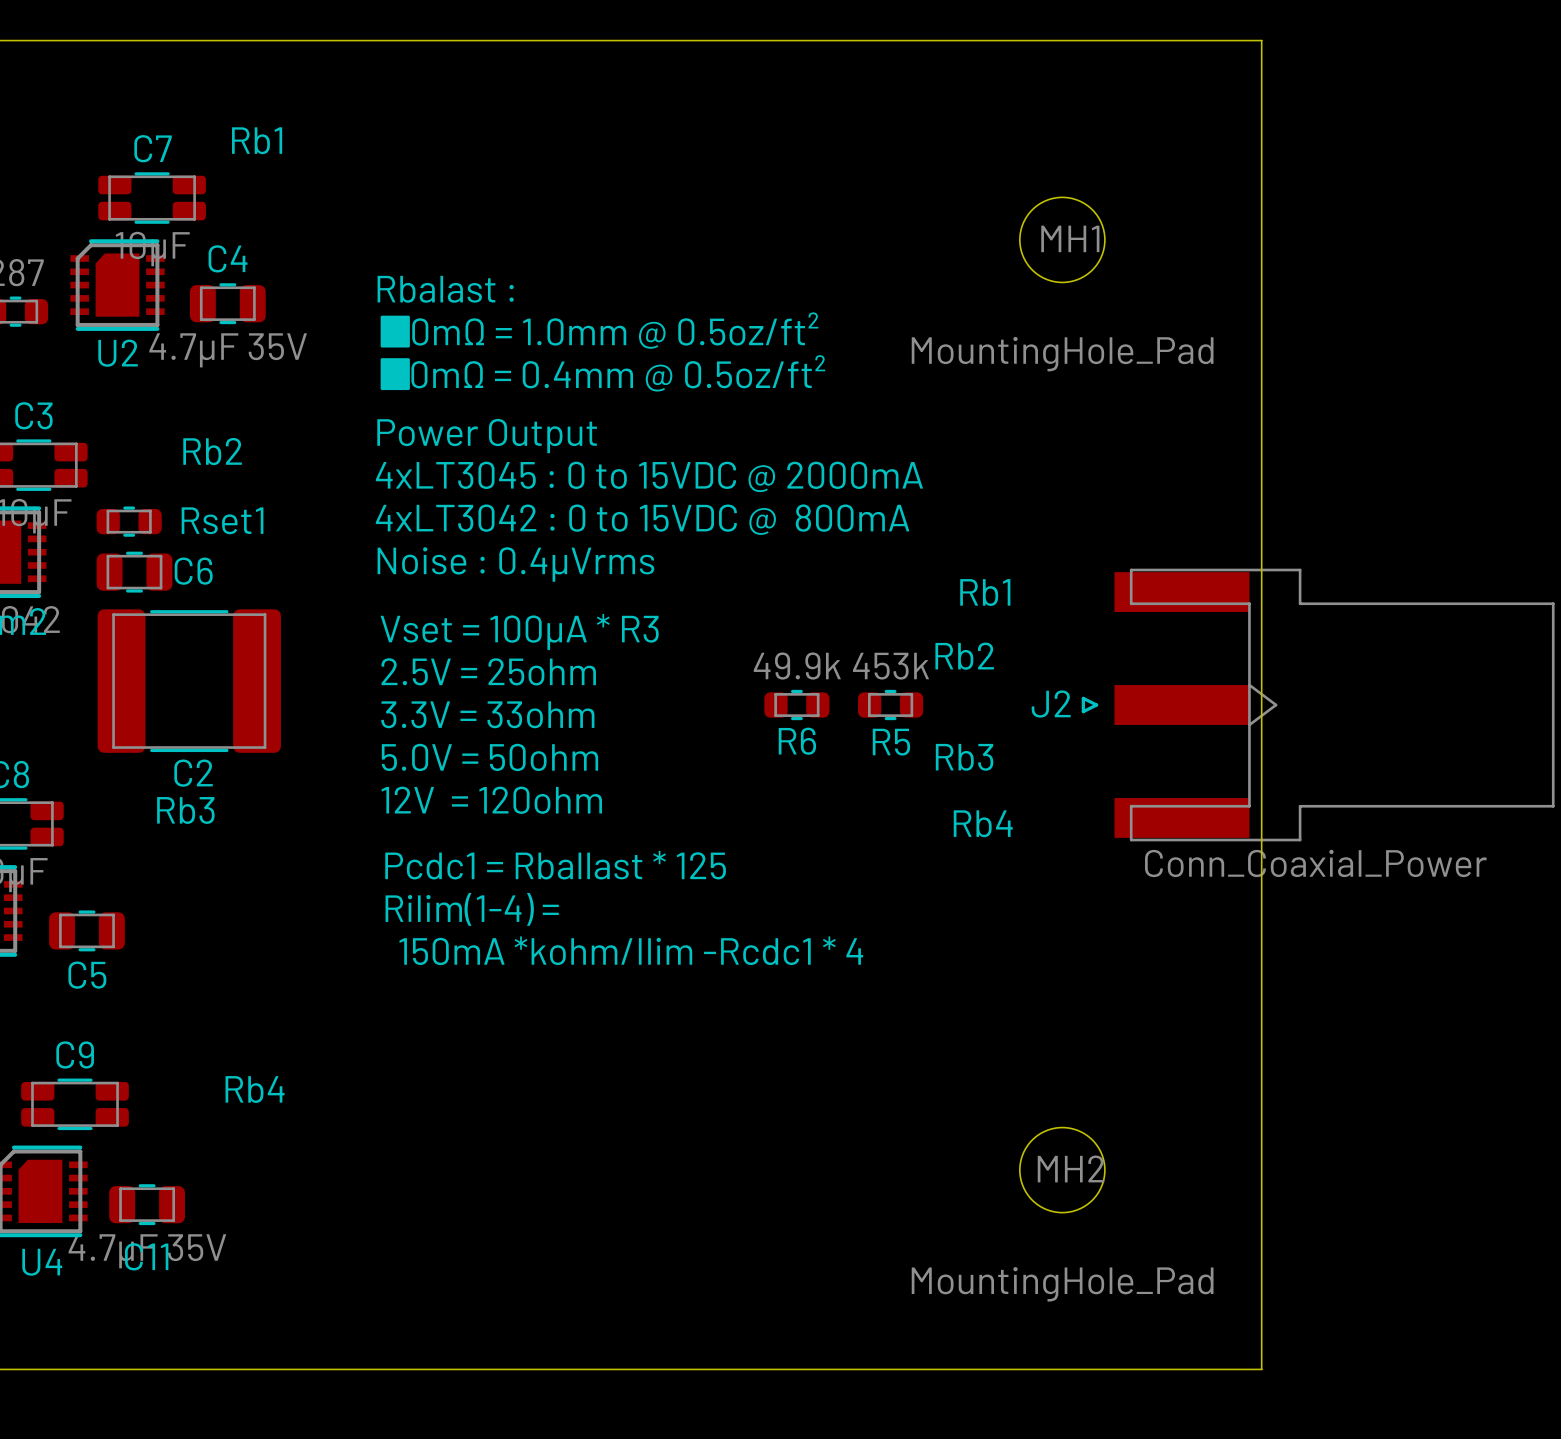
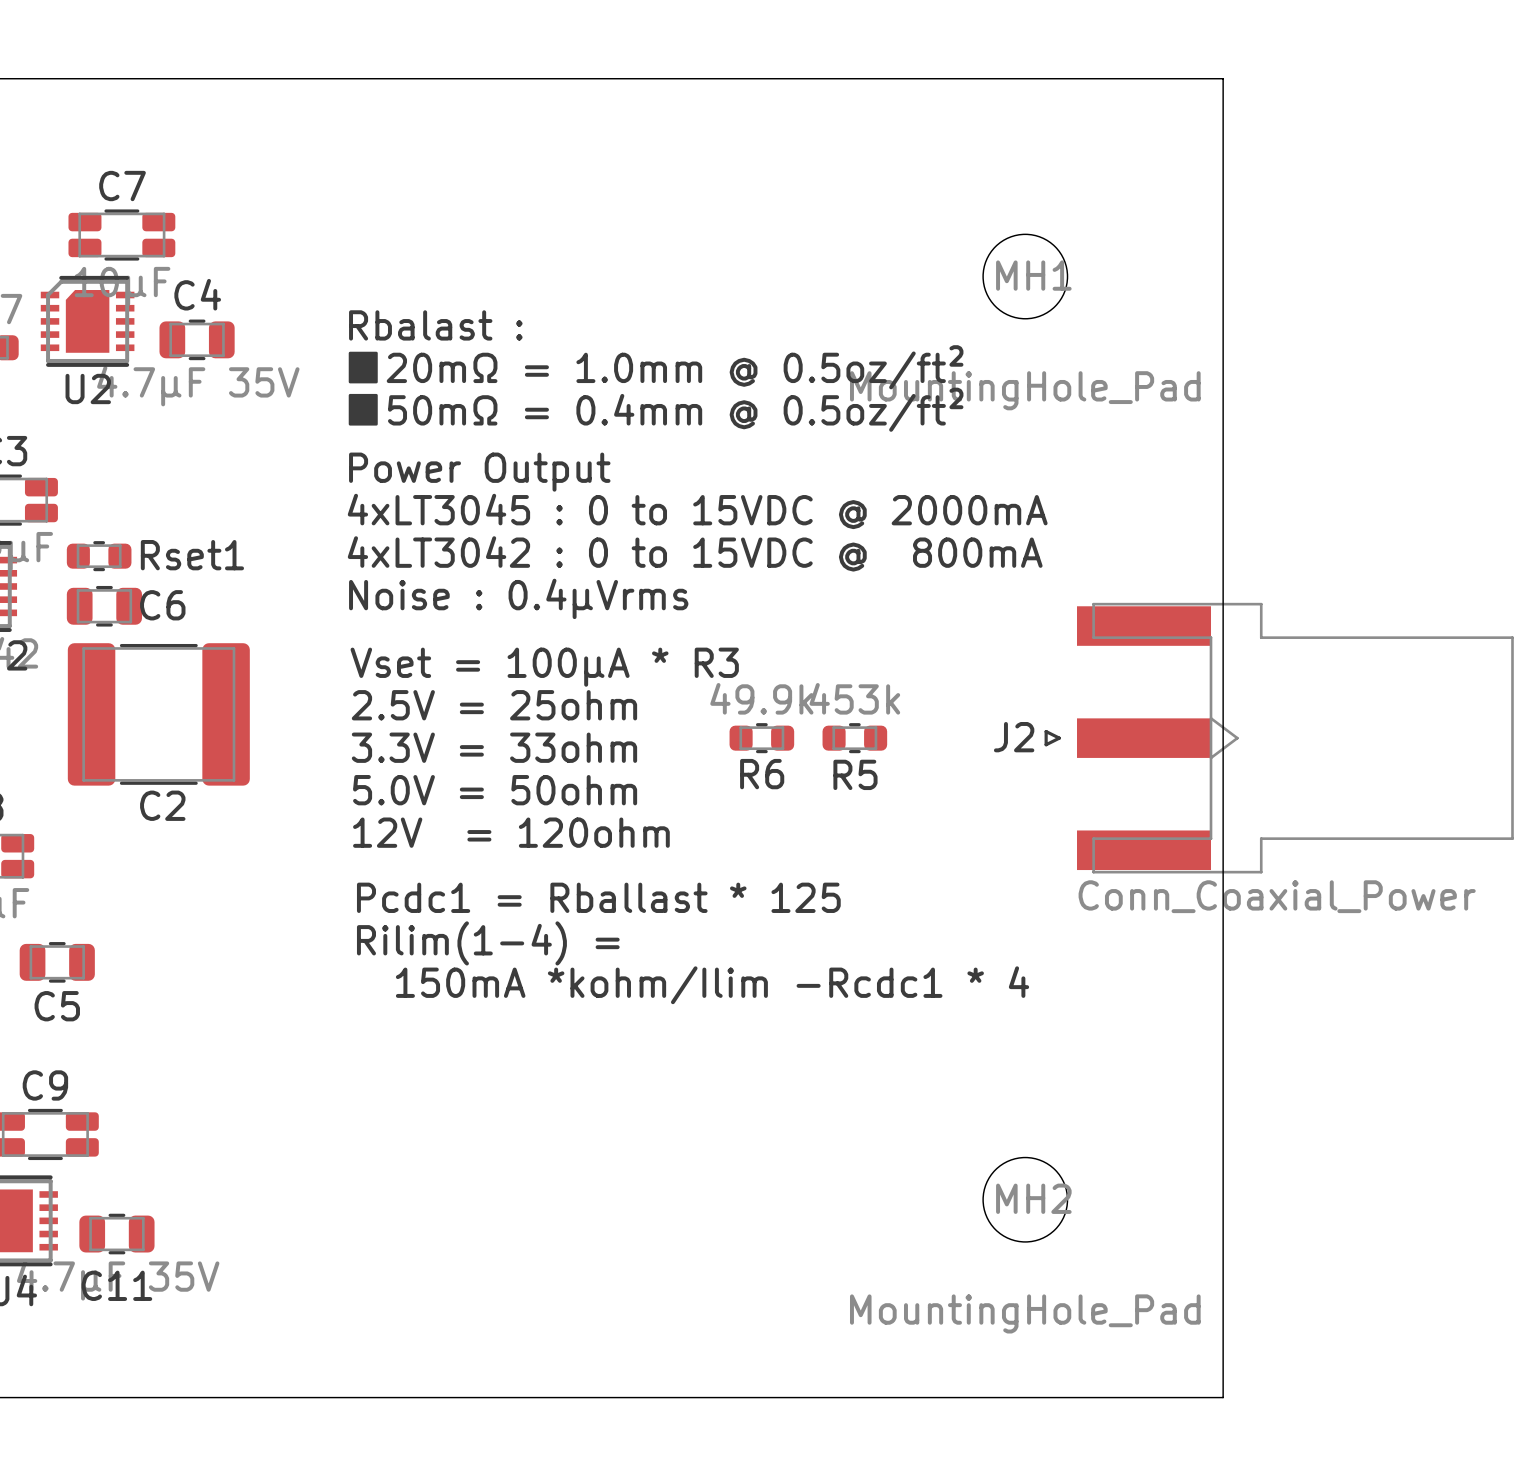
text: Rb1 (257, 140) -> none
text: Rb2 (212, 451) -> none
text: Rb1 (985, 592) -> none
text: Rb2 (964, 656) -> none
text: Rb3 (964, 757) -> none
text: Rb3 (185, 810) -> none
text: Rb4 (983, 823) -> none
text: Rb4 (255, 1089) -> none

